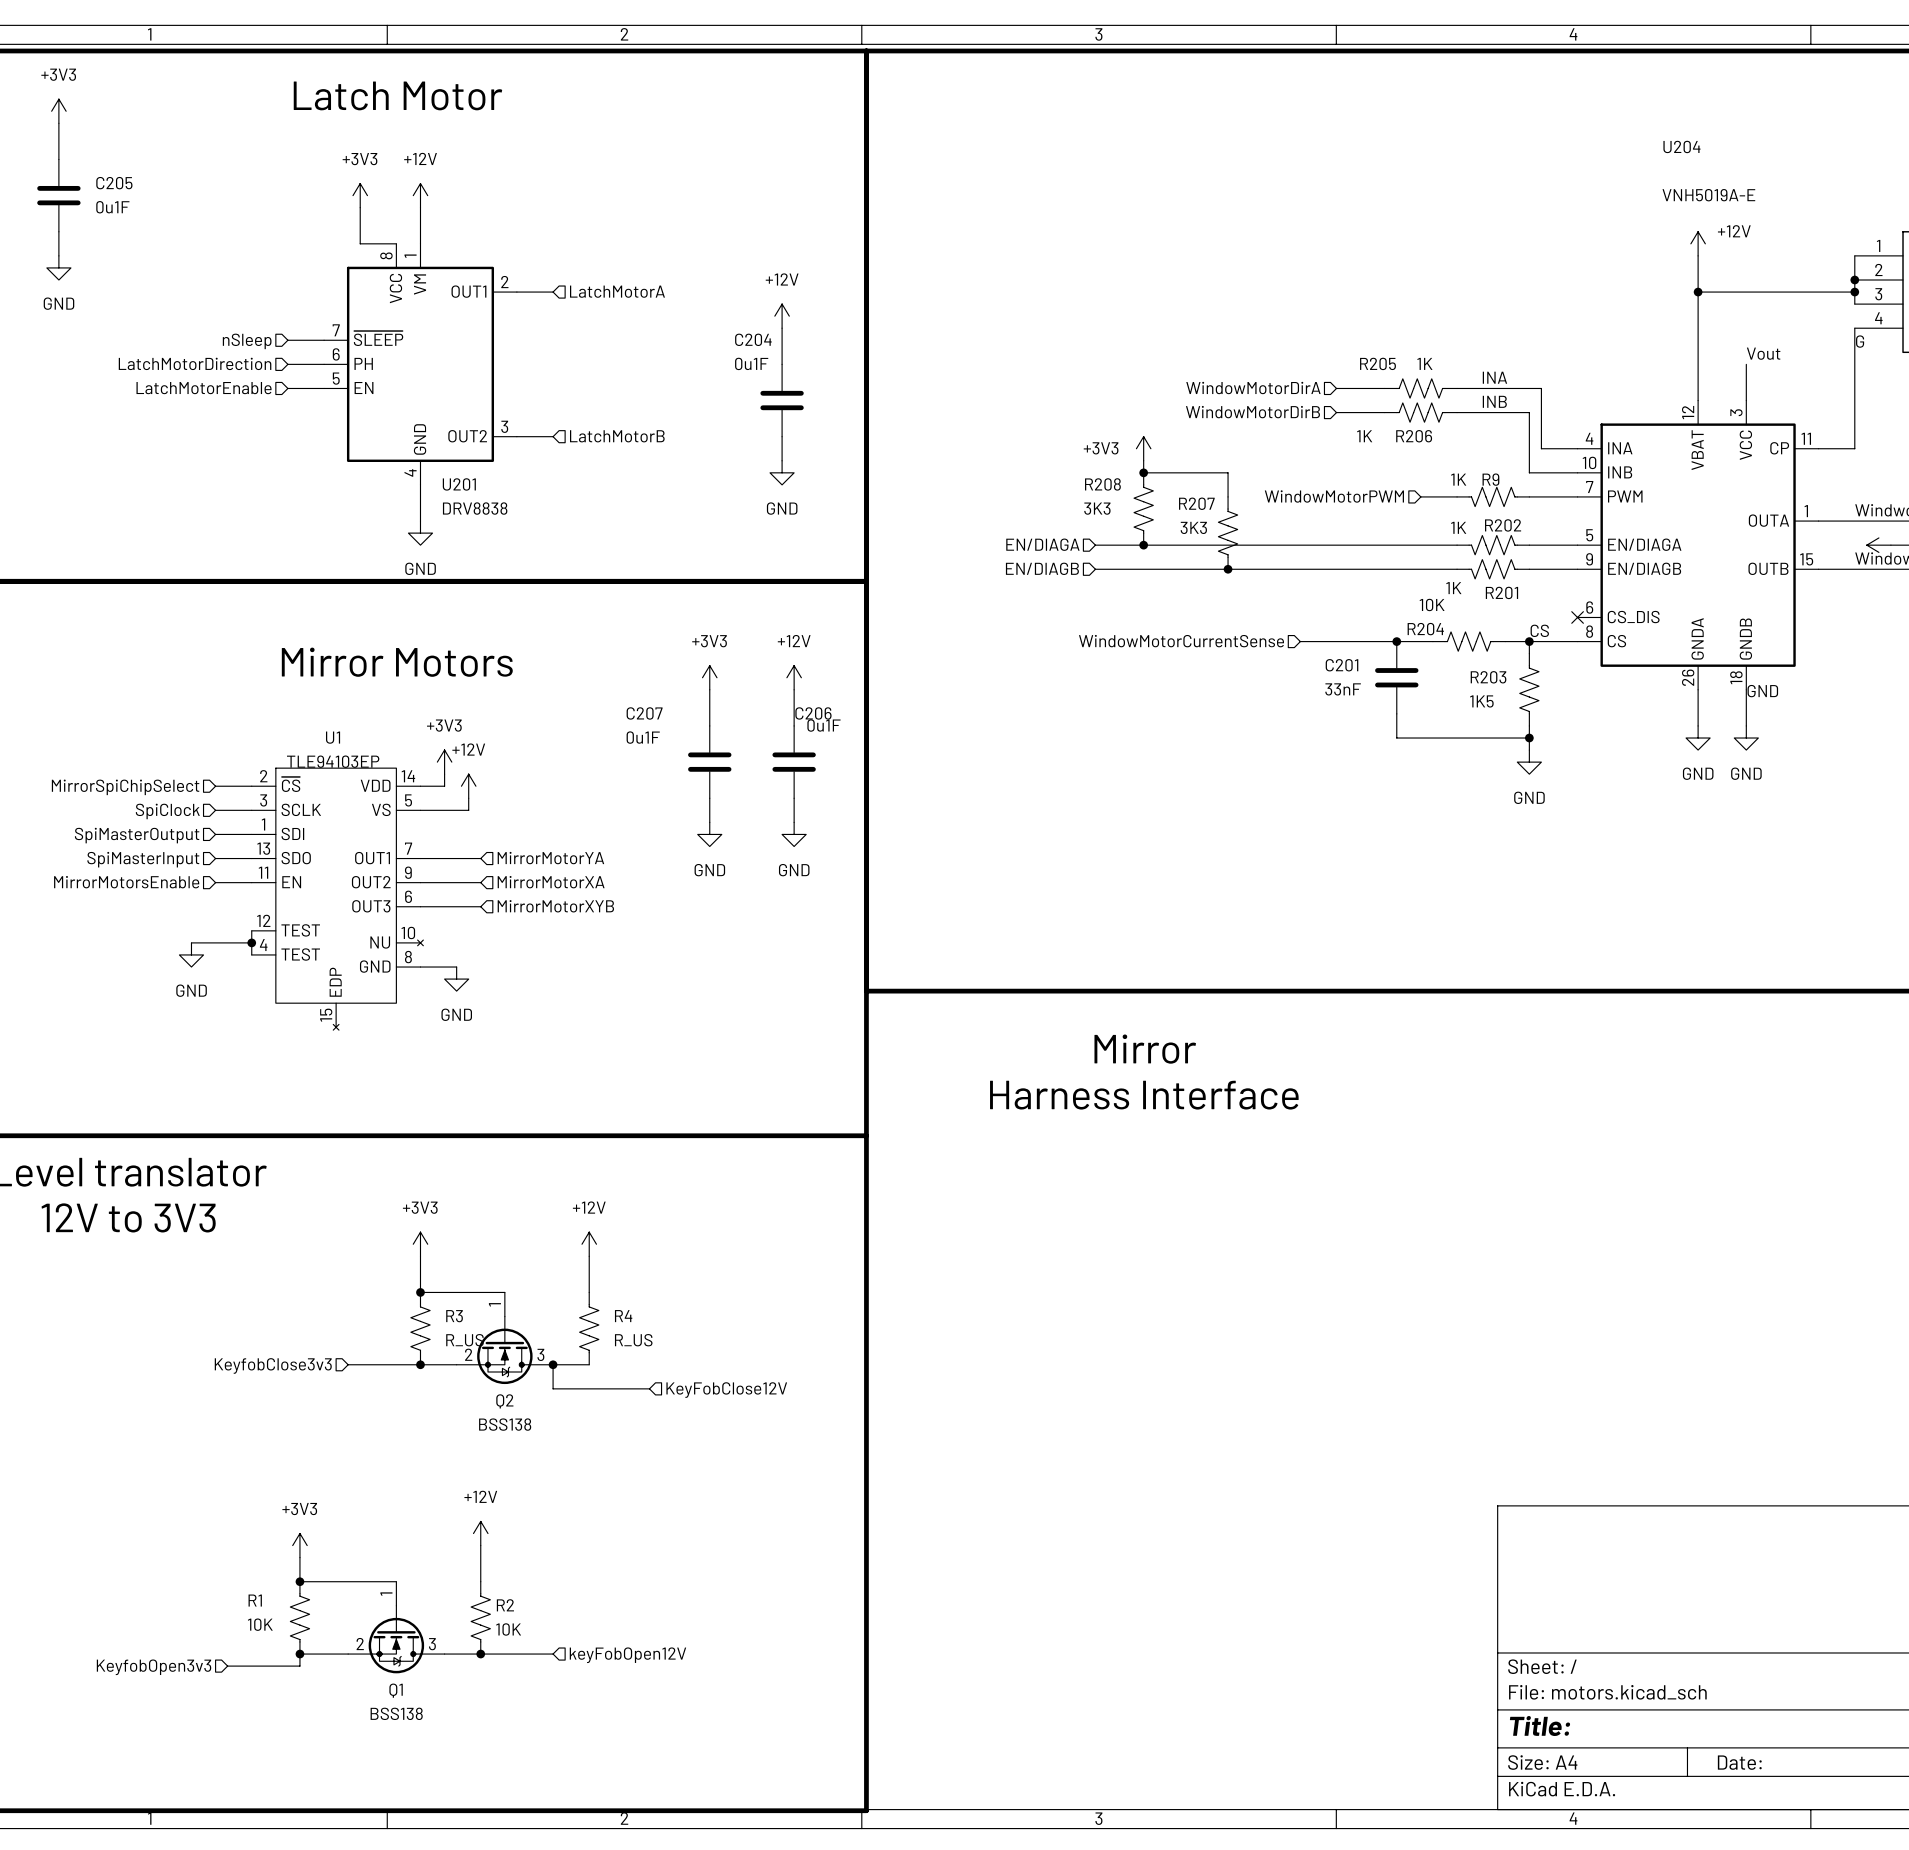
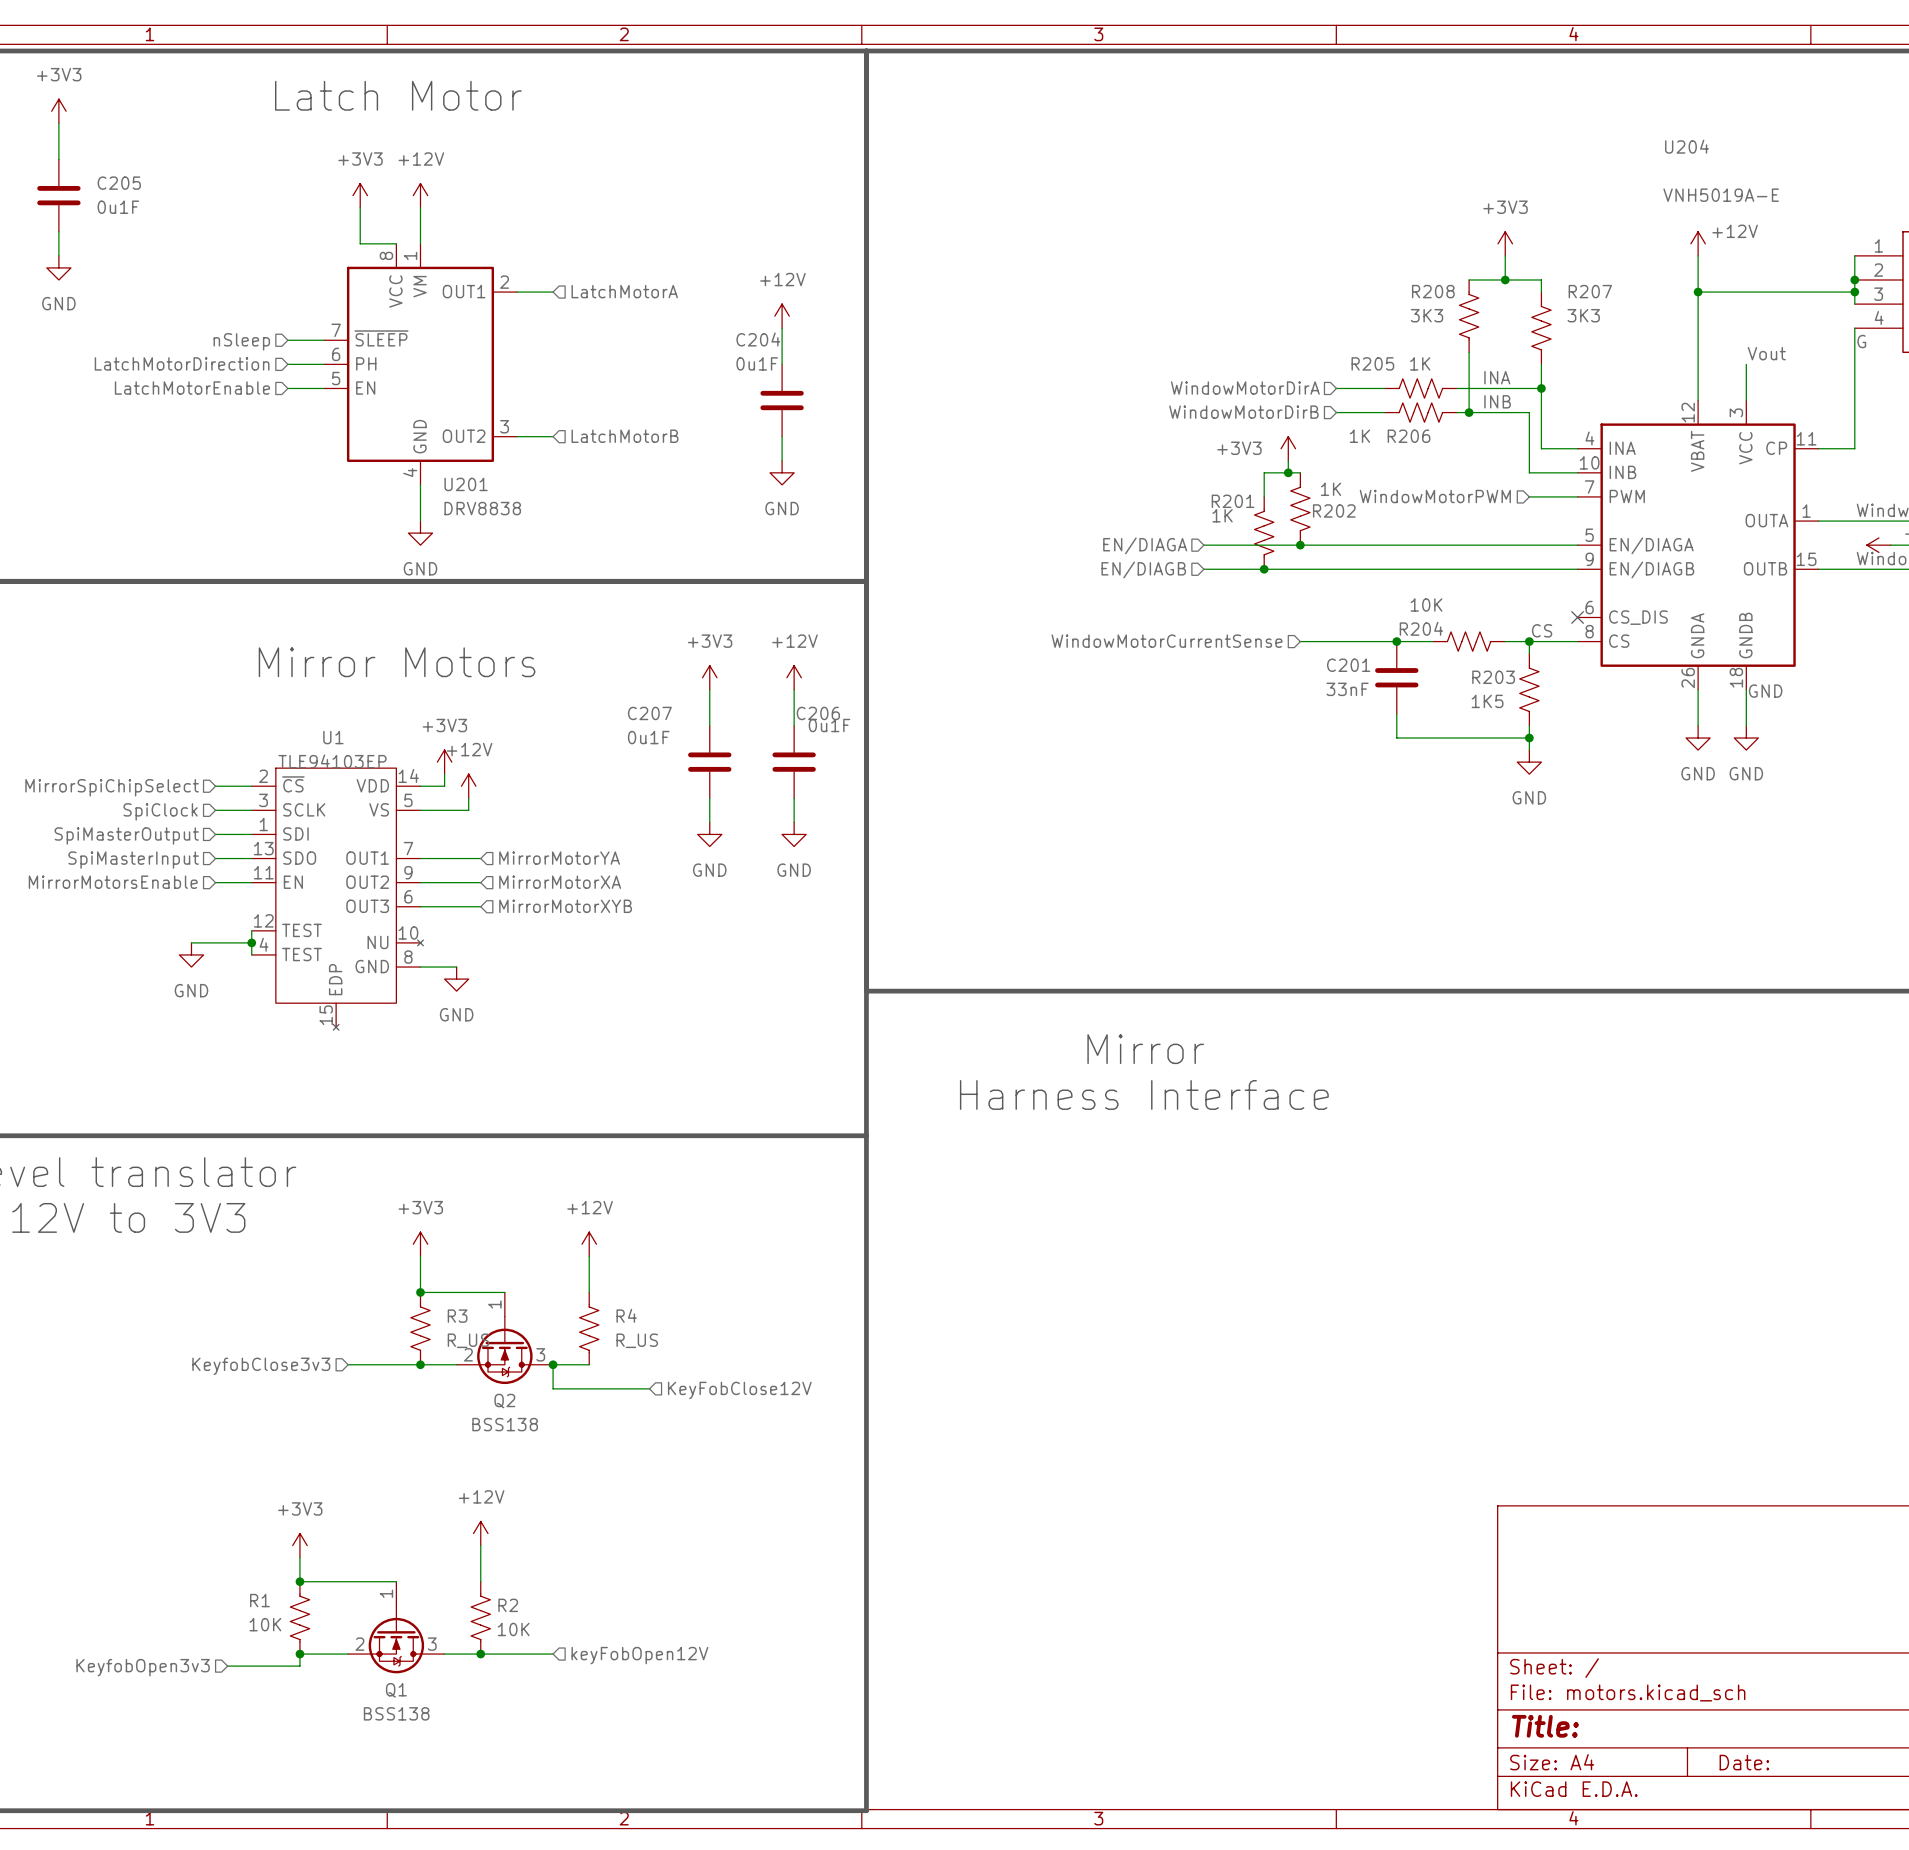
power symbol: none -> +3V3 (1505, 243)
wire: none -> (1505, 255) (1505, 279)
wire: none -> (1469, 279) (1541, 279) (1541, 292)
junction: none -> (1505, 279)
wire: none -> (1469, 352) (1469, 412)
wire: none -> (1541, 364) (1541, 388)
junction: none -> (1541, 388)
junction: none -> (1469, 412)
power symbol position: +3V3 (1143, 448) -> +3V3 (1288, 448)
wire: (1143, 460) (1143, 472) (1228, 472) (1228, 496) -> none
wire: none -> (1288, 460) (1288, 472)
junction: (1143, 472) -> none
junction: none -> (1288, 472)
wire: none -> (1300, 472) (1264, 472) (1264, 496)
hierarchical label position: WindowMotorPWM (1334, 496) -> WindowMotorPWM (1435, 496)
wire: (1420, 496) (1457, 496) -> none
R9: 1K (1493, 496) -> none
R207 name position: R207 (1196, 503) -> R207 (1590, 291)
R208 position: (1143, 509) -> (1469, 316)
R207 value position: 3K3 (1193, 527) -> 3K3 (1583, 315)
R202 value position: 1K (1458, 527) -> 1K (1331, 489)
R207 position: (1228, 533) -> (1541, 328)
hierarchical label position: EN/DIAGA (1042, 544) -> EN/DIAGA (1145, 545)
wire: (1095, 545) (1203, 545) -> none
junction: (1143, 545) -> none
junction: none -> (1300, 545)
R202 rotation: 0° (1493, 545) -> 90° clockwise (1300, 509)
R202 position: (1493, 545) -> (1300, 509)
hierarchical label position: EN/DIAGB (1042, 568) -> EN/DIAGB (1143, 569)
wire: (1095, 569) (1203, 569) -> none
junction position: (1228, 569) -> (1264, 569)
R201 rotation: 0° (1493, 569) -> 90° clockwise (1264, 533)
R201 position: (1493, 569) -> (1264, 533)
R201 value position: 1K (1453, 588) -> 1K (1222, 515)
R201 name position: R201 (1501, 592) -> R201 (1233, 501)

